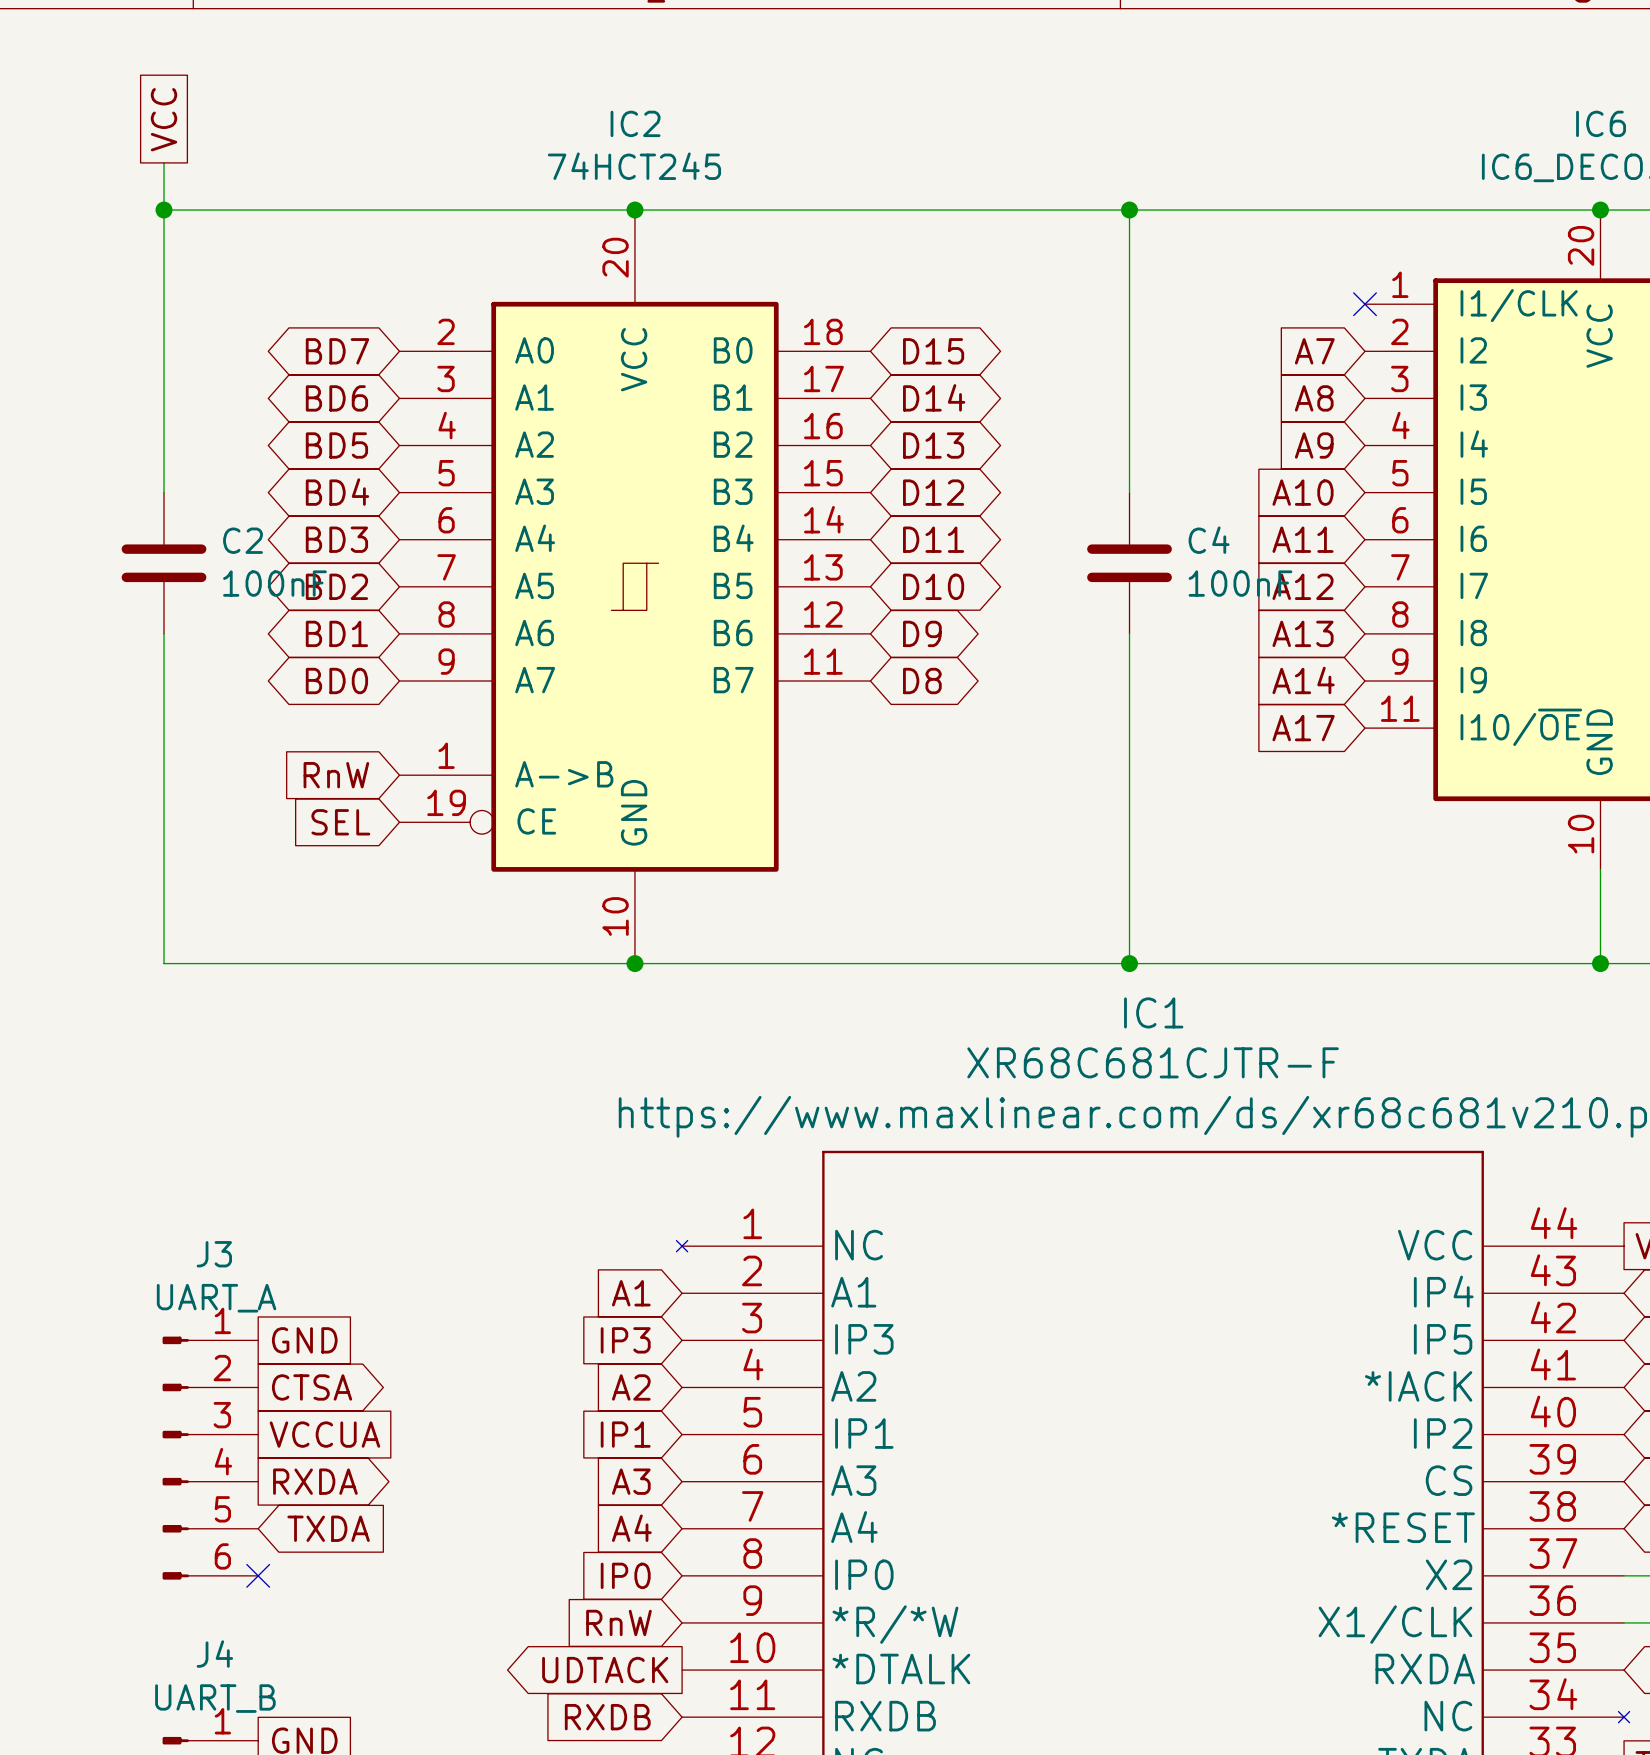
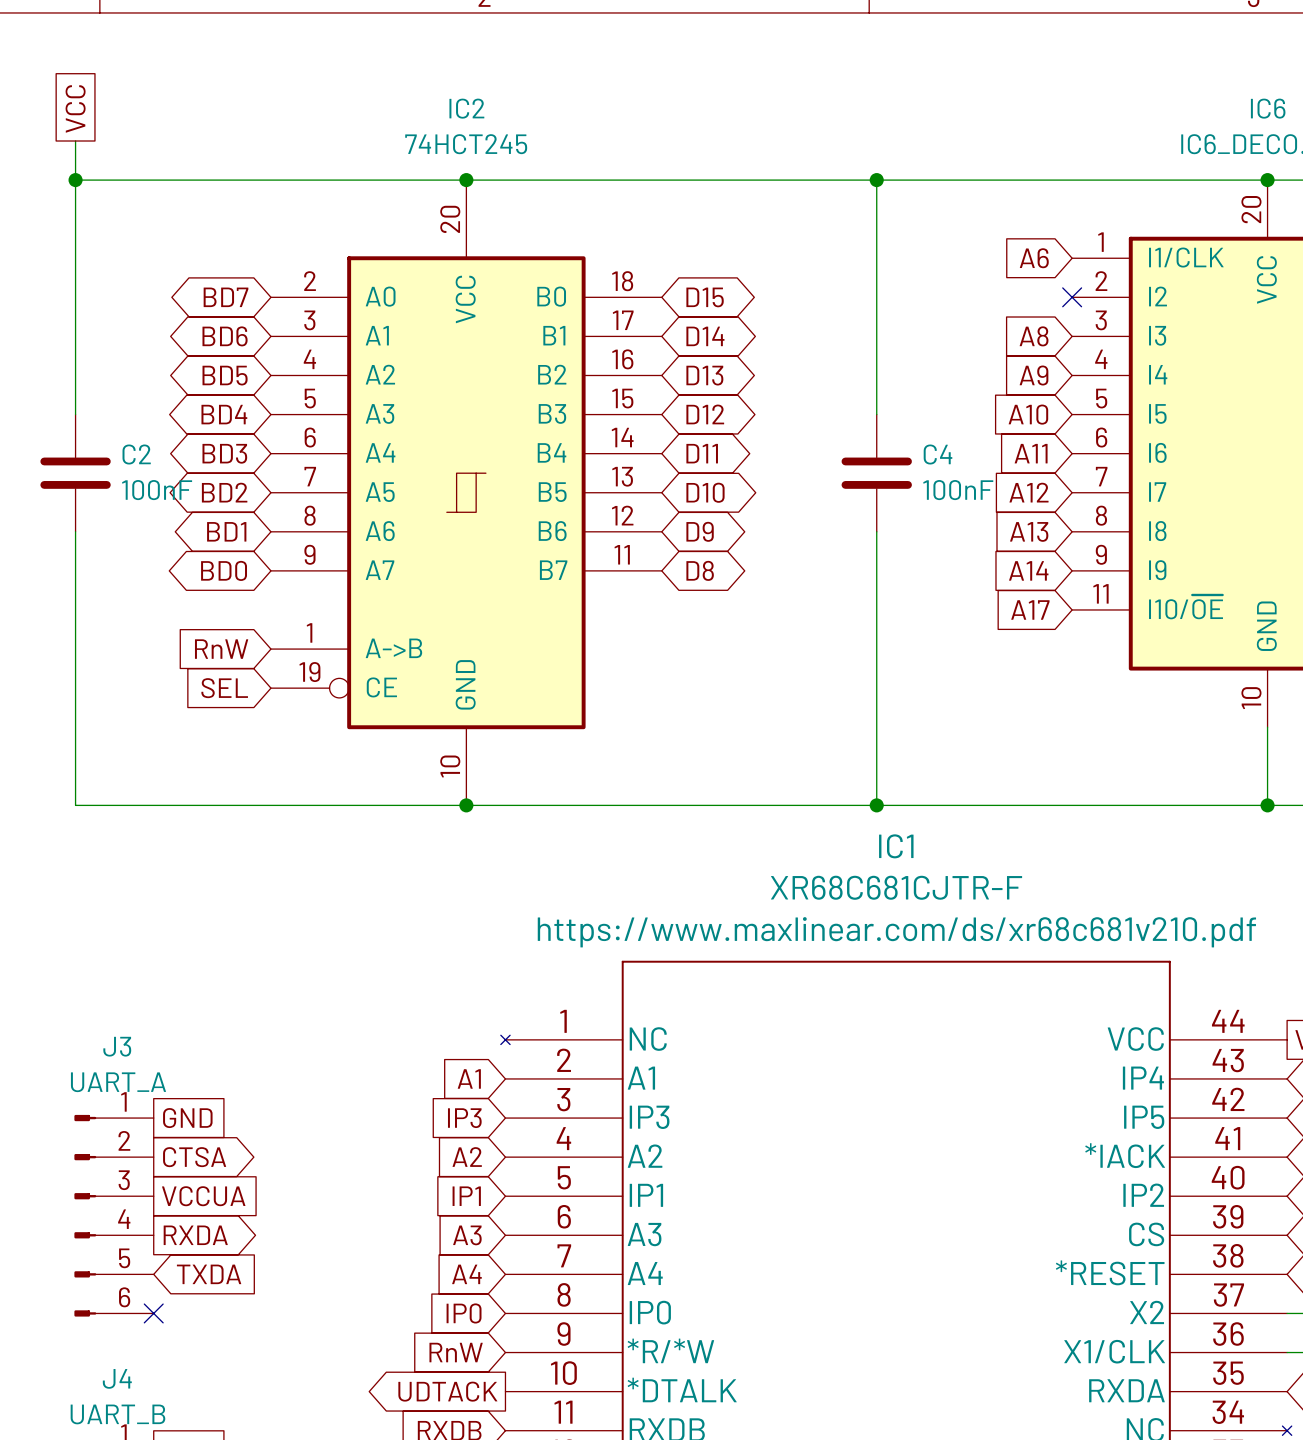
global label: none -> A6 (1034, 258)
no-connect mark position: (1365, 304) -> (1072, 297)
global label: A7 (1314, 351) -> none

